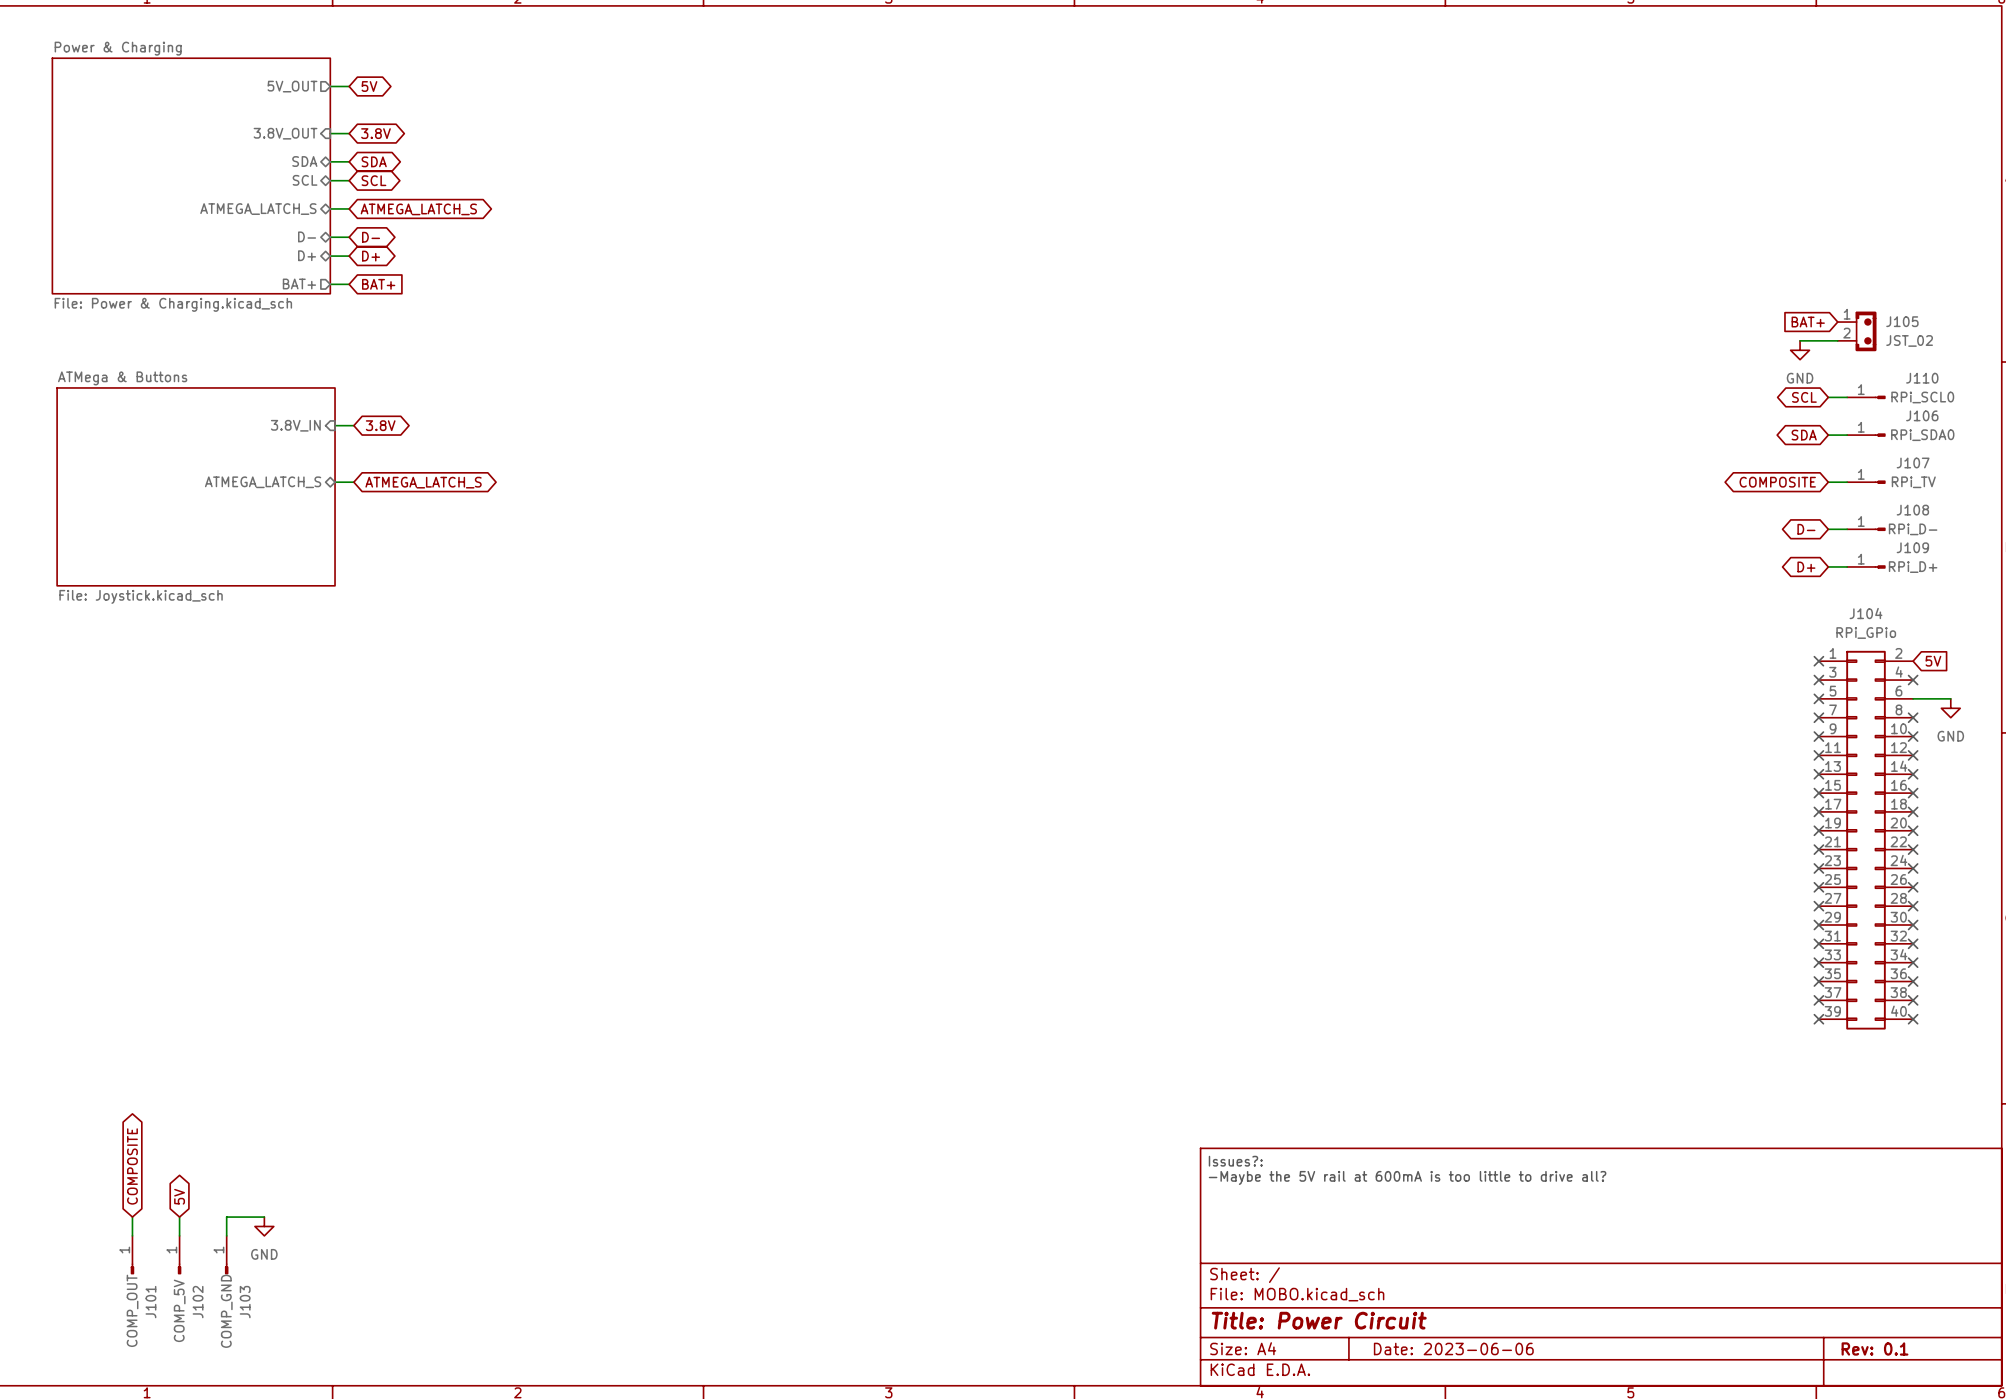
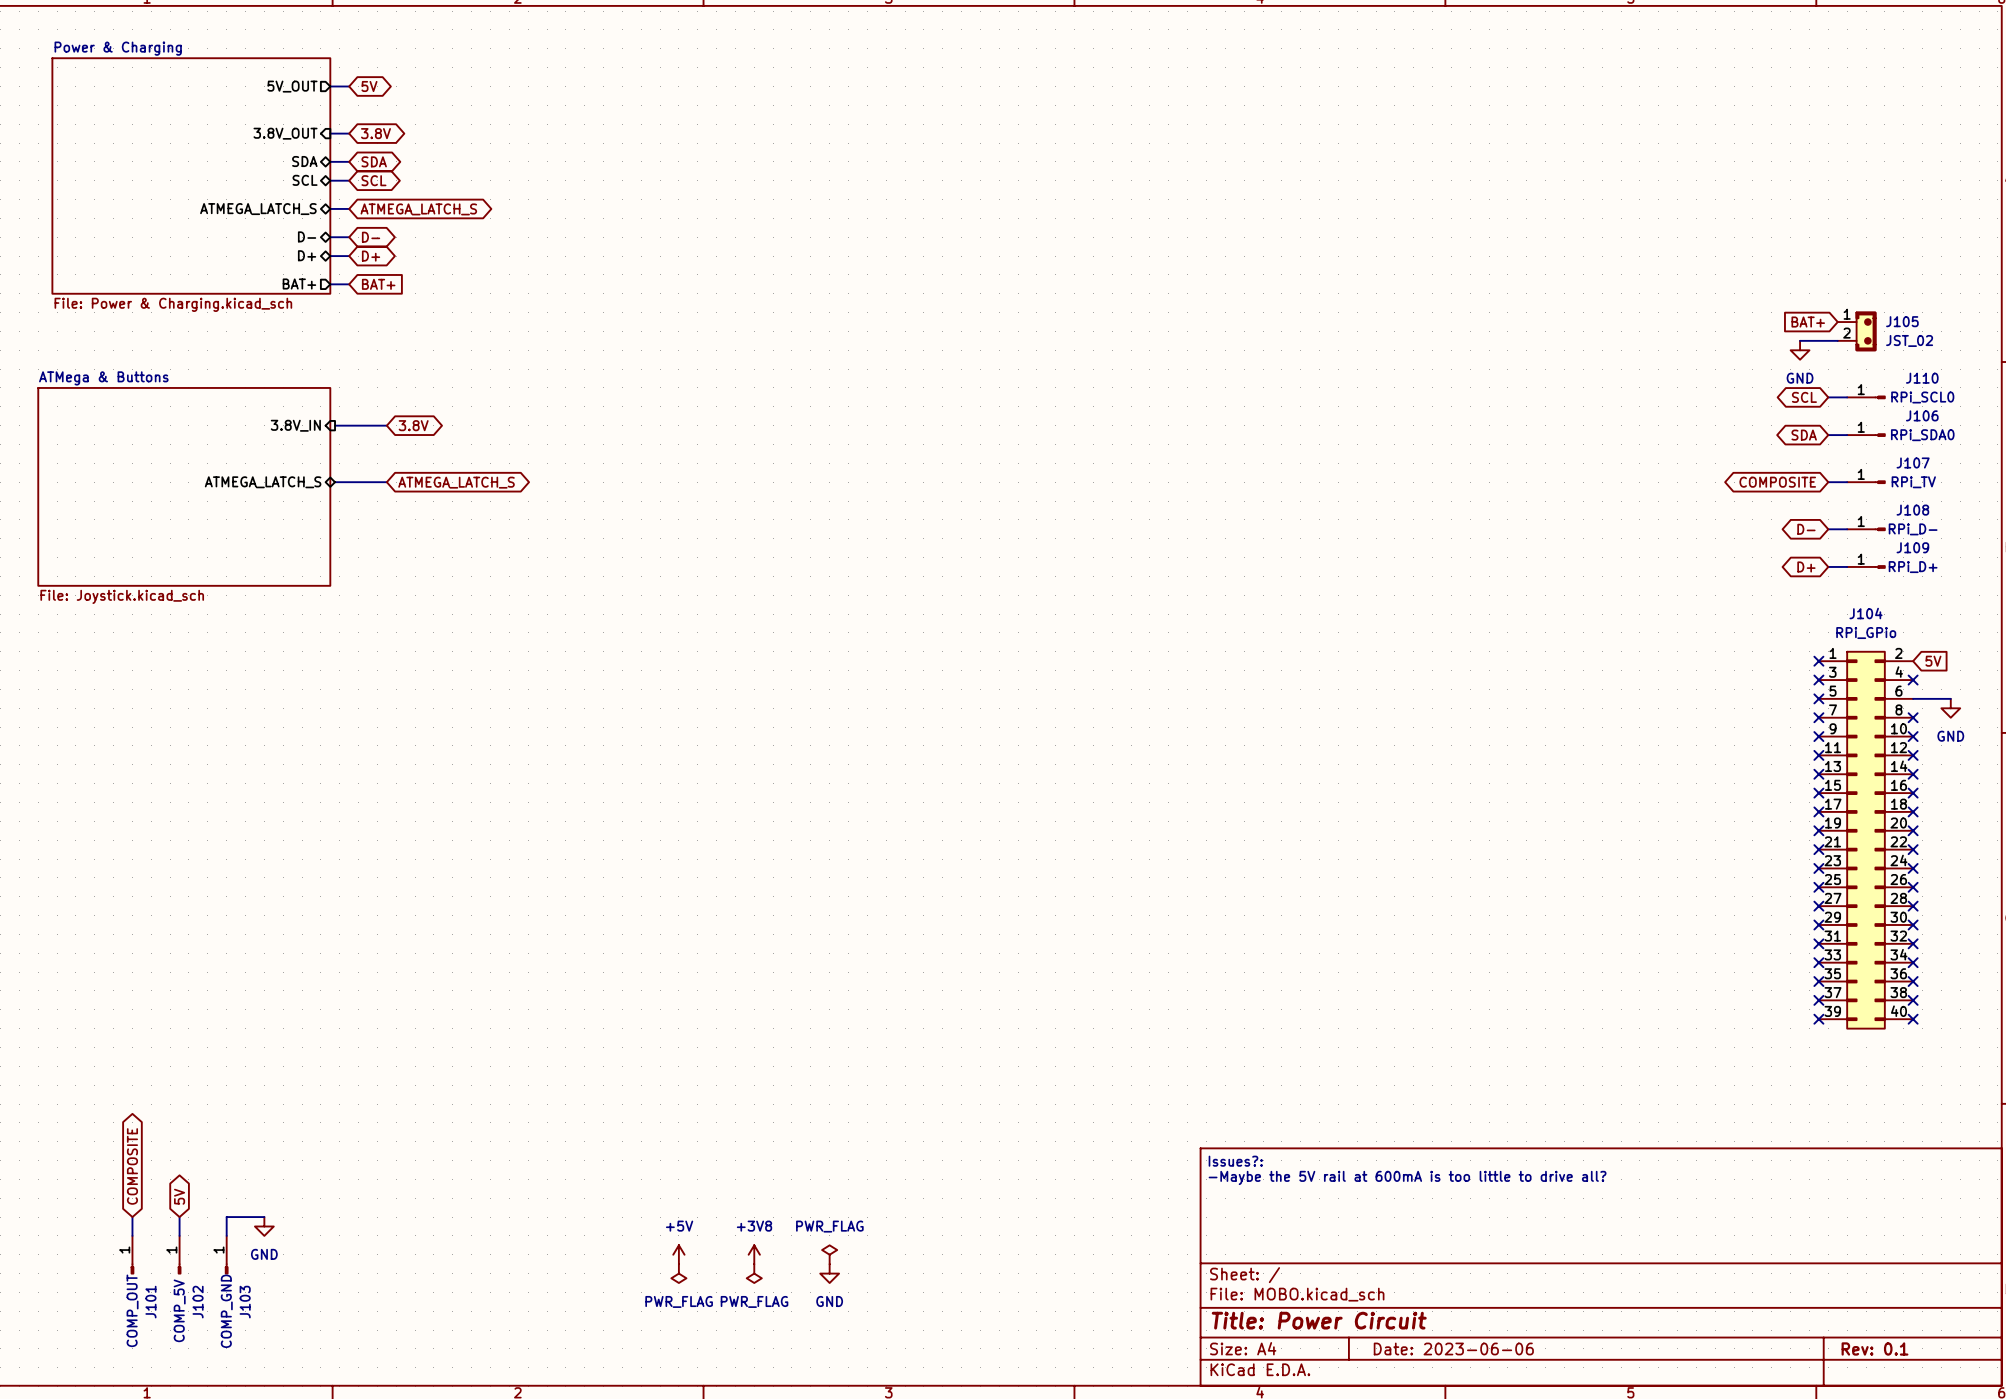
wire: none -> (353, 425) (386, 425)
global label position: 3.8V (380, 425) -> 3.8V (413, 425)
wire: none -> (353, 482) (386, 482)
global label position: ATMEGA_LATCH_S (423, 482) -> ATMEGA_LATCH_S (456, 482)
sheet ATMega & Buttons: none -> File: Joystick.kicad_sch (184, 486)
sheet ATMega & Buttons: File: Joystick.kicad_sch (196, 486) -> none
power symbol: none -> +5V (678, 1254)
power symbol: none -> +3V8 (754, 1254)
power symbol: none -> PWR_FLAG (829, 1254)
power symbol: none -> PWR_FLAG (678, 1273)
power symbol: none -> PWR_FLAG (754, 1273)
power symbol: none -> GND (829, 1273)

